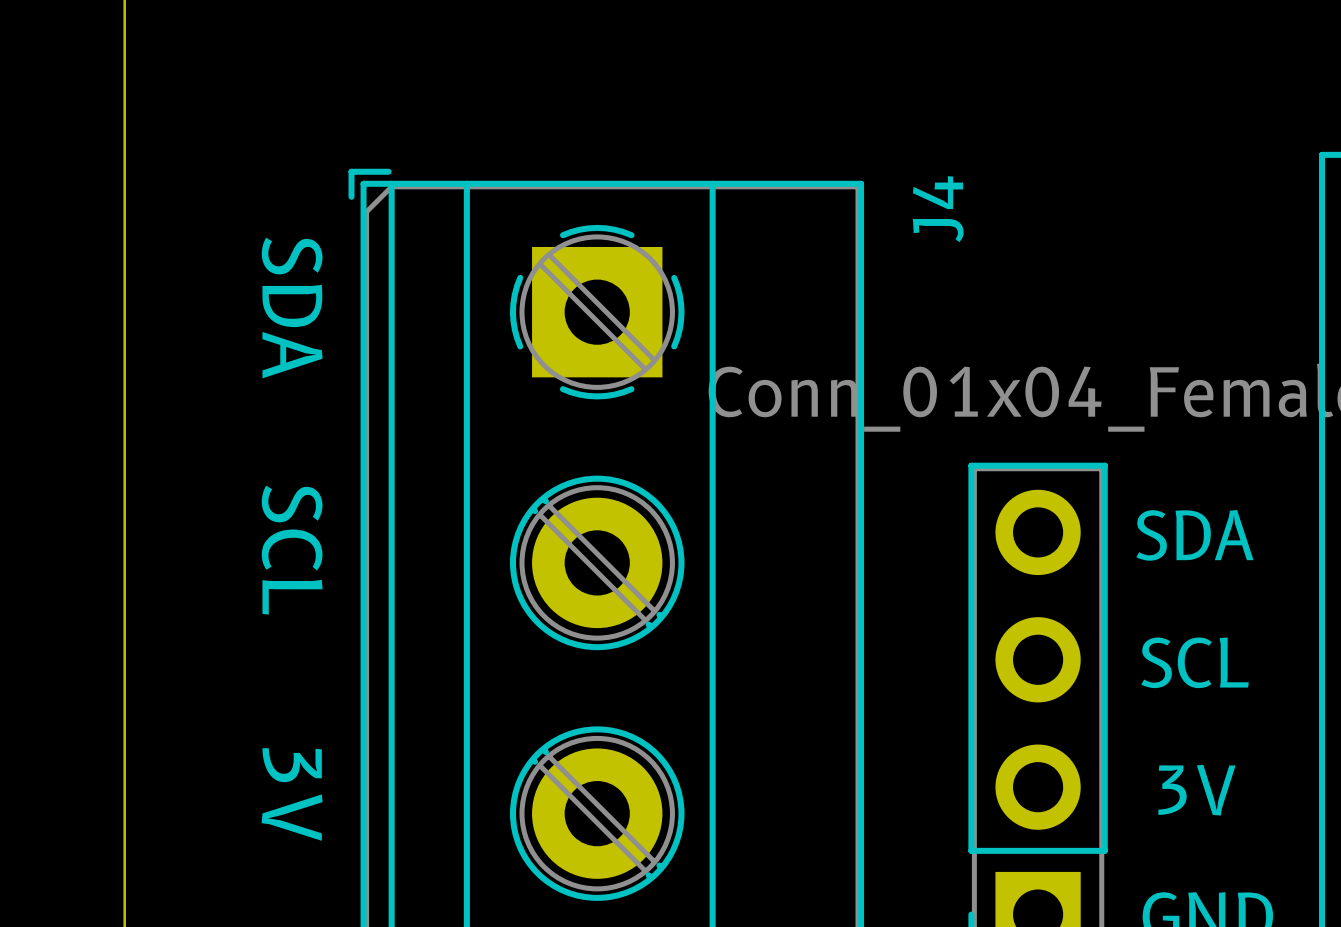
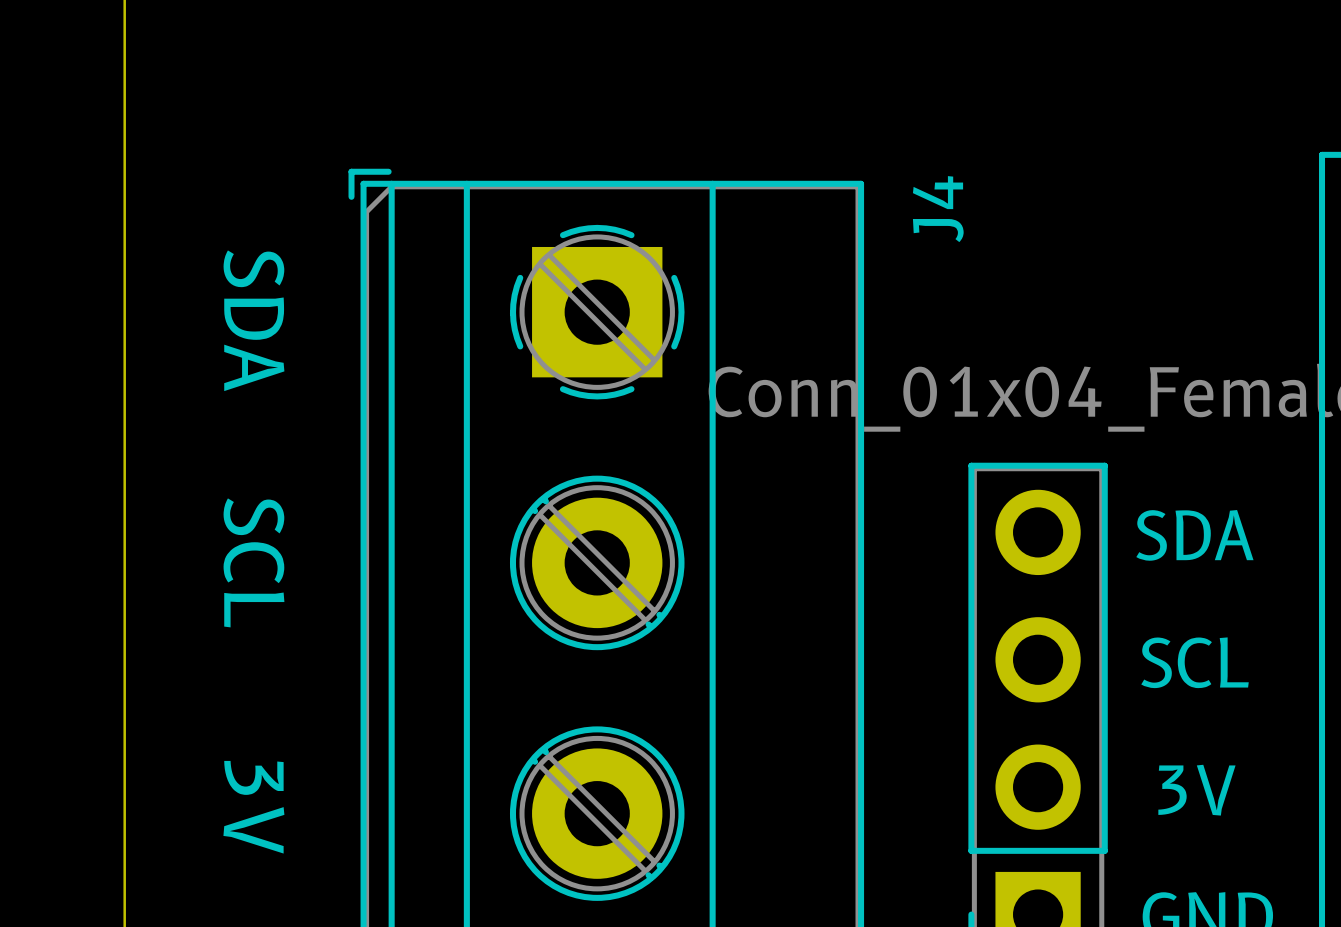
text position: SDA (292, 308) -> SDA (253, 320)
text position: SCL (292, 550) -> SCL (253, 562)
text position: 3V (292, 794) -> 3V (253, 807)

